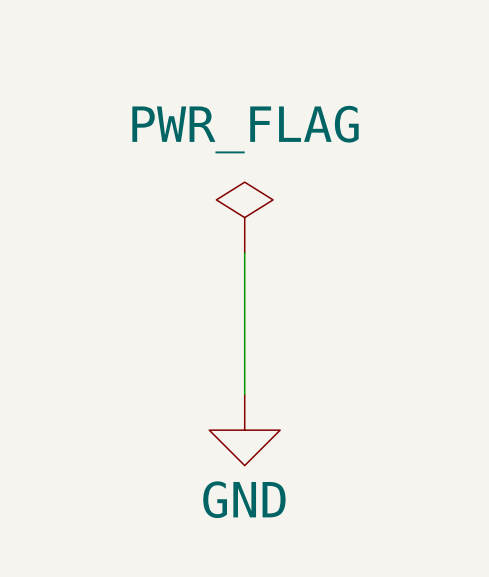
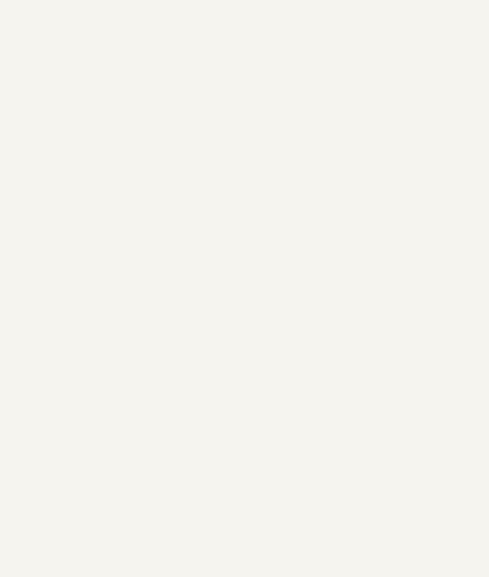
power symbol: PWR_FLAG (244, 217) -> none
wire: (244, 253) (244, 394) -> none
power symbol: GND (244, 430) -> none

